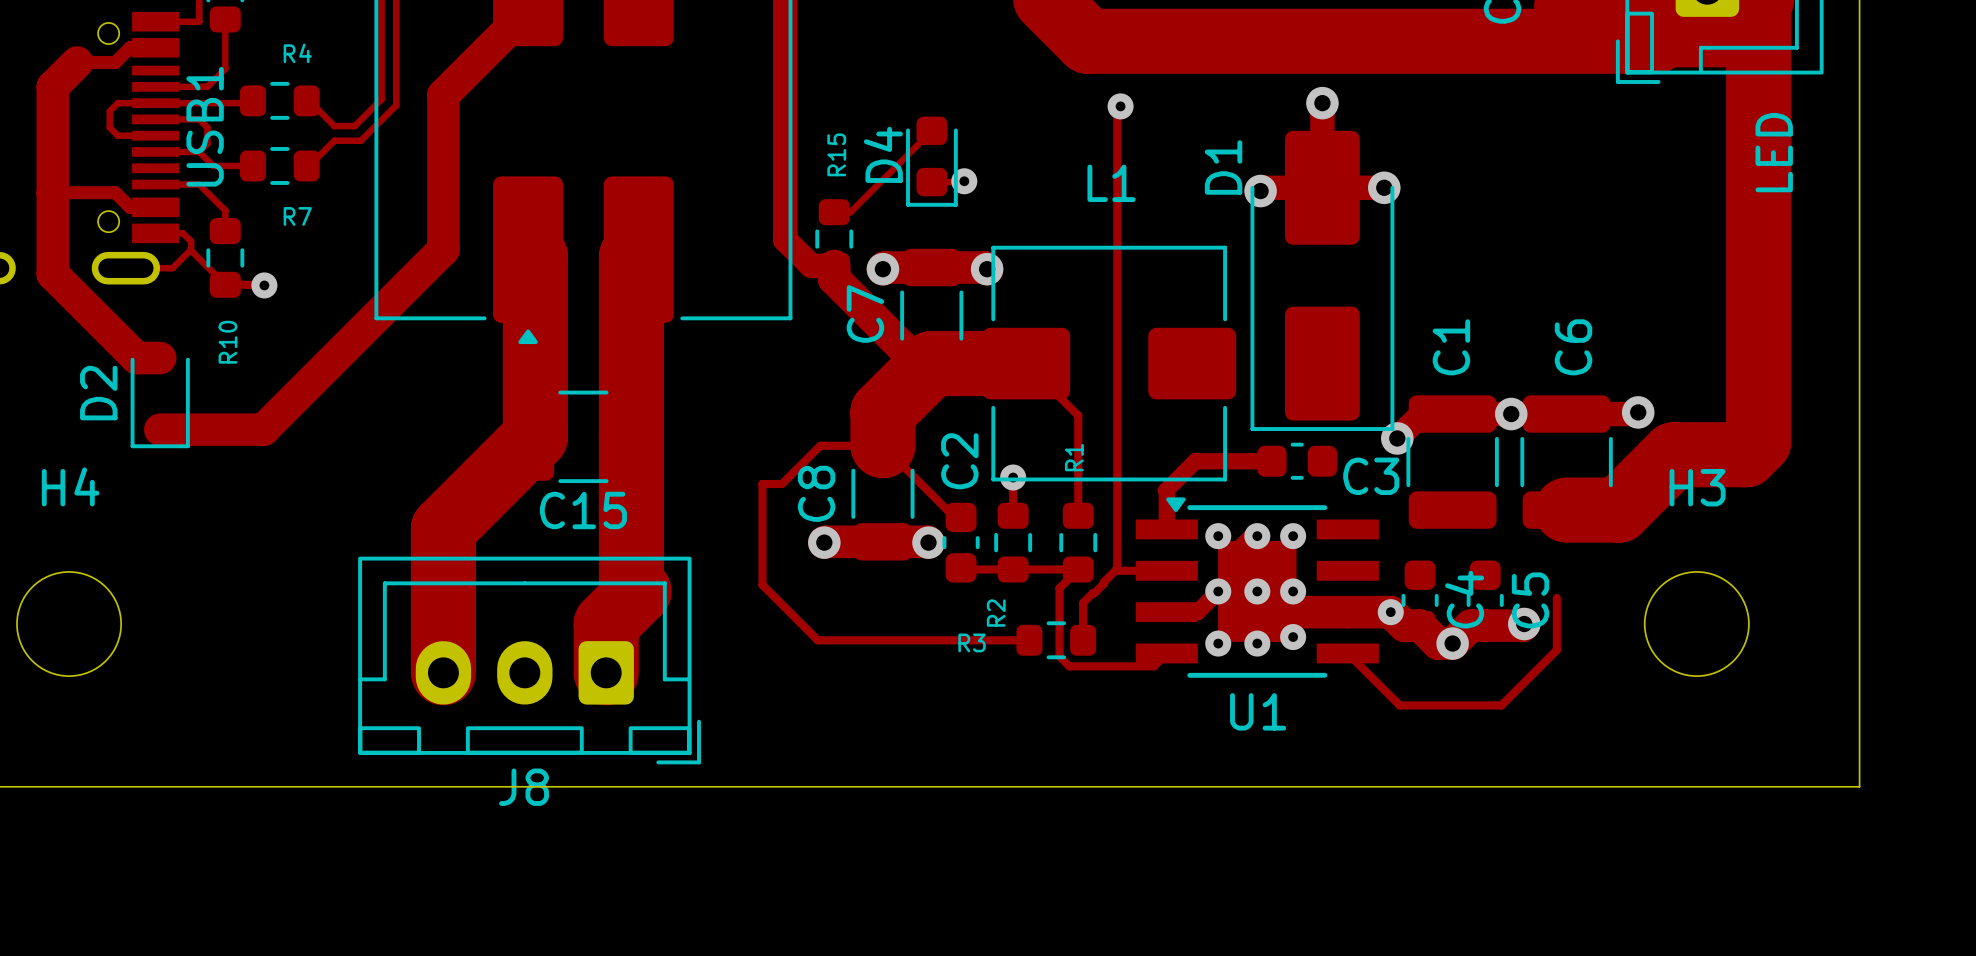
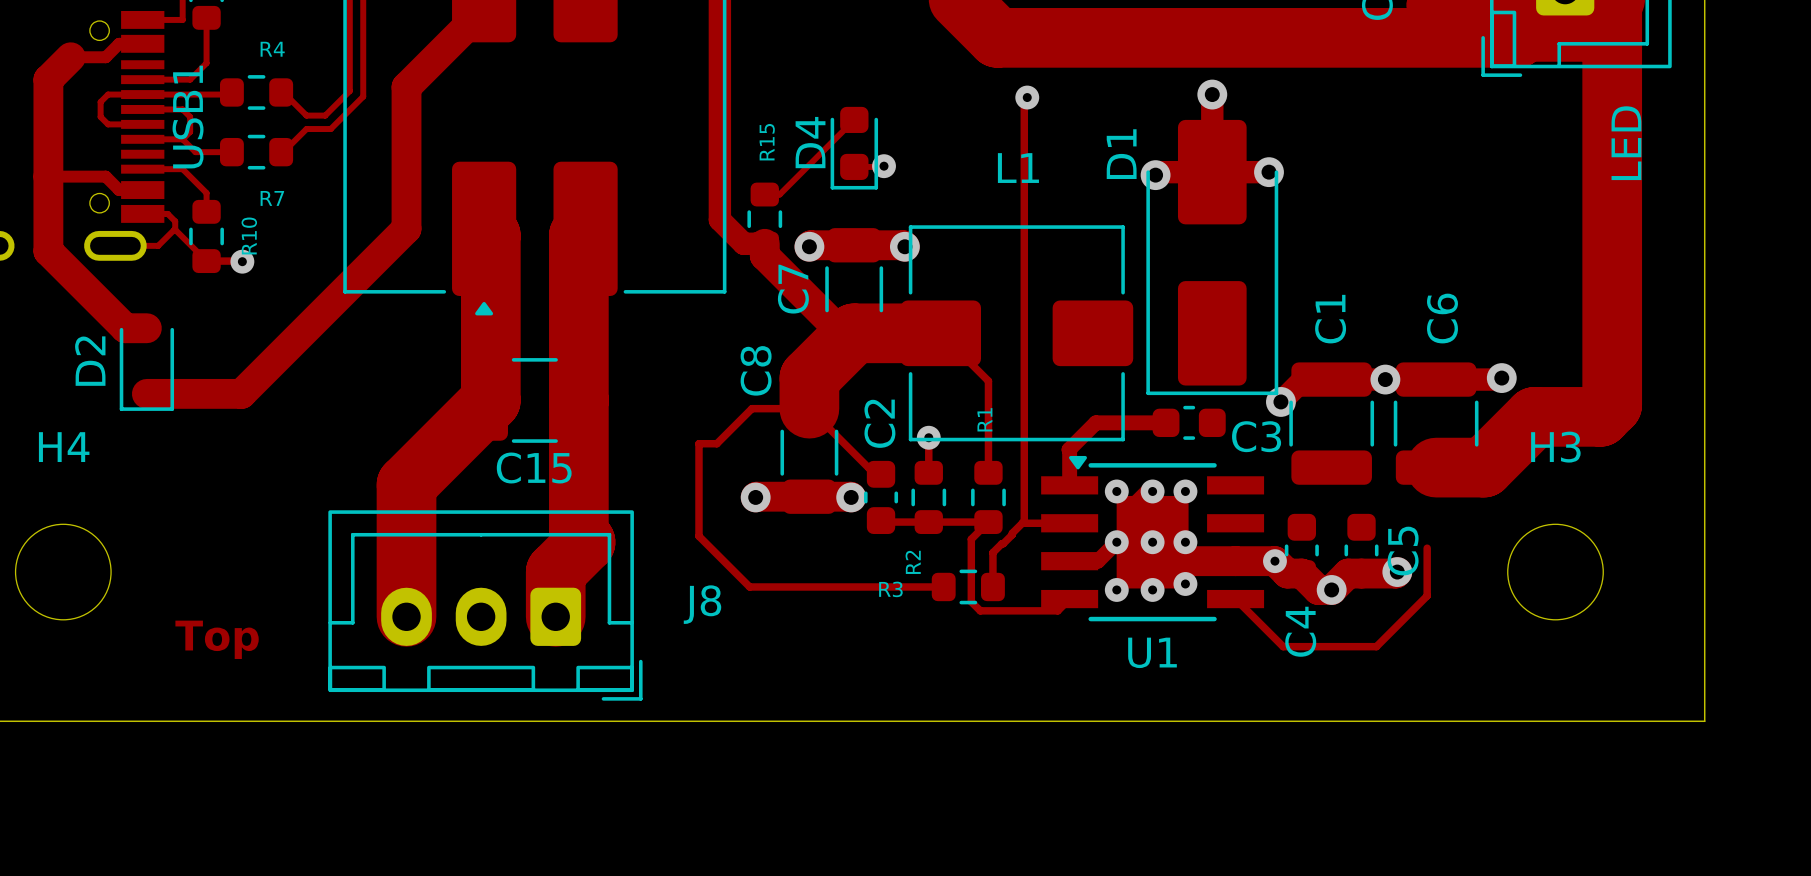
R10 name position: R10 (227, 342) -> R10 (249, 235)
C8 name position: C8 (816, 493) -> C8 (756, 370)
C4 name position: C4 (1464, 599) -> C4 (1300, 631)
text: none -> Top (217, 639)
J8 name position: J8 (524, 787) -> J8 (702, 604)

